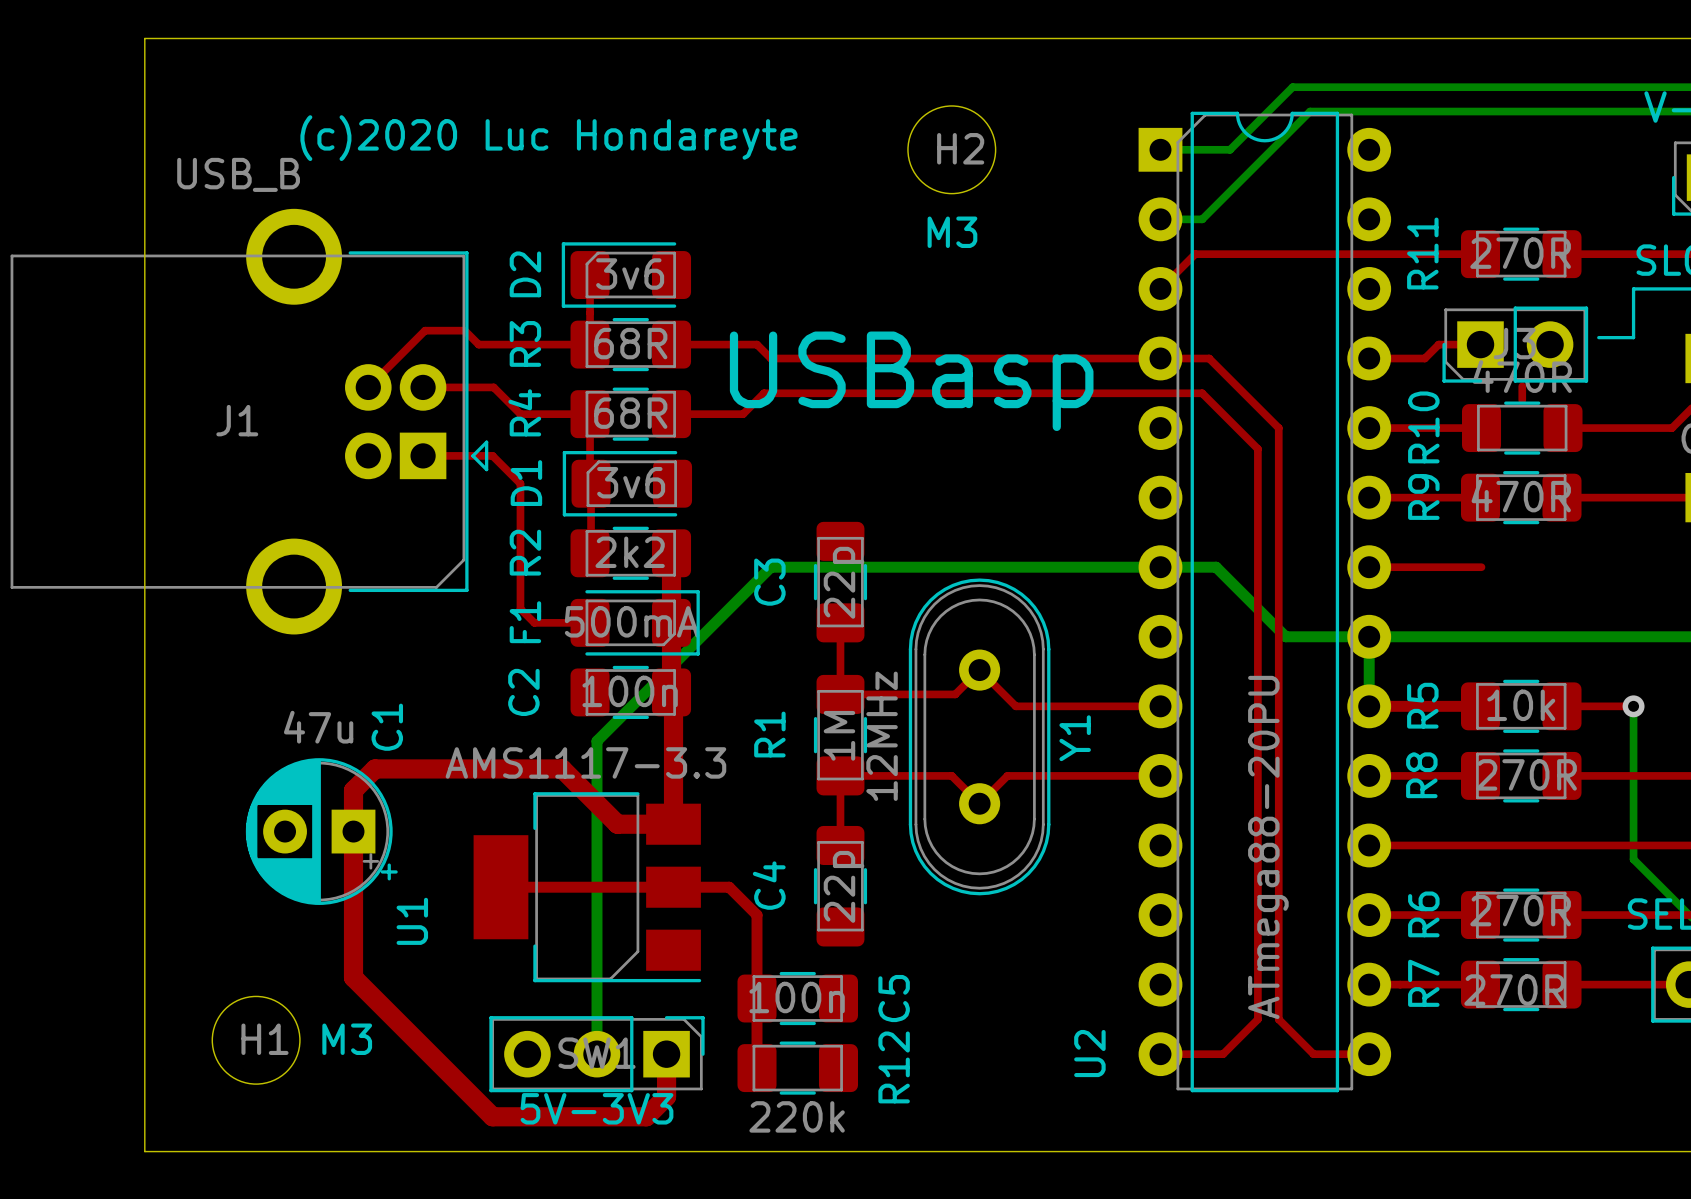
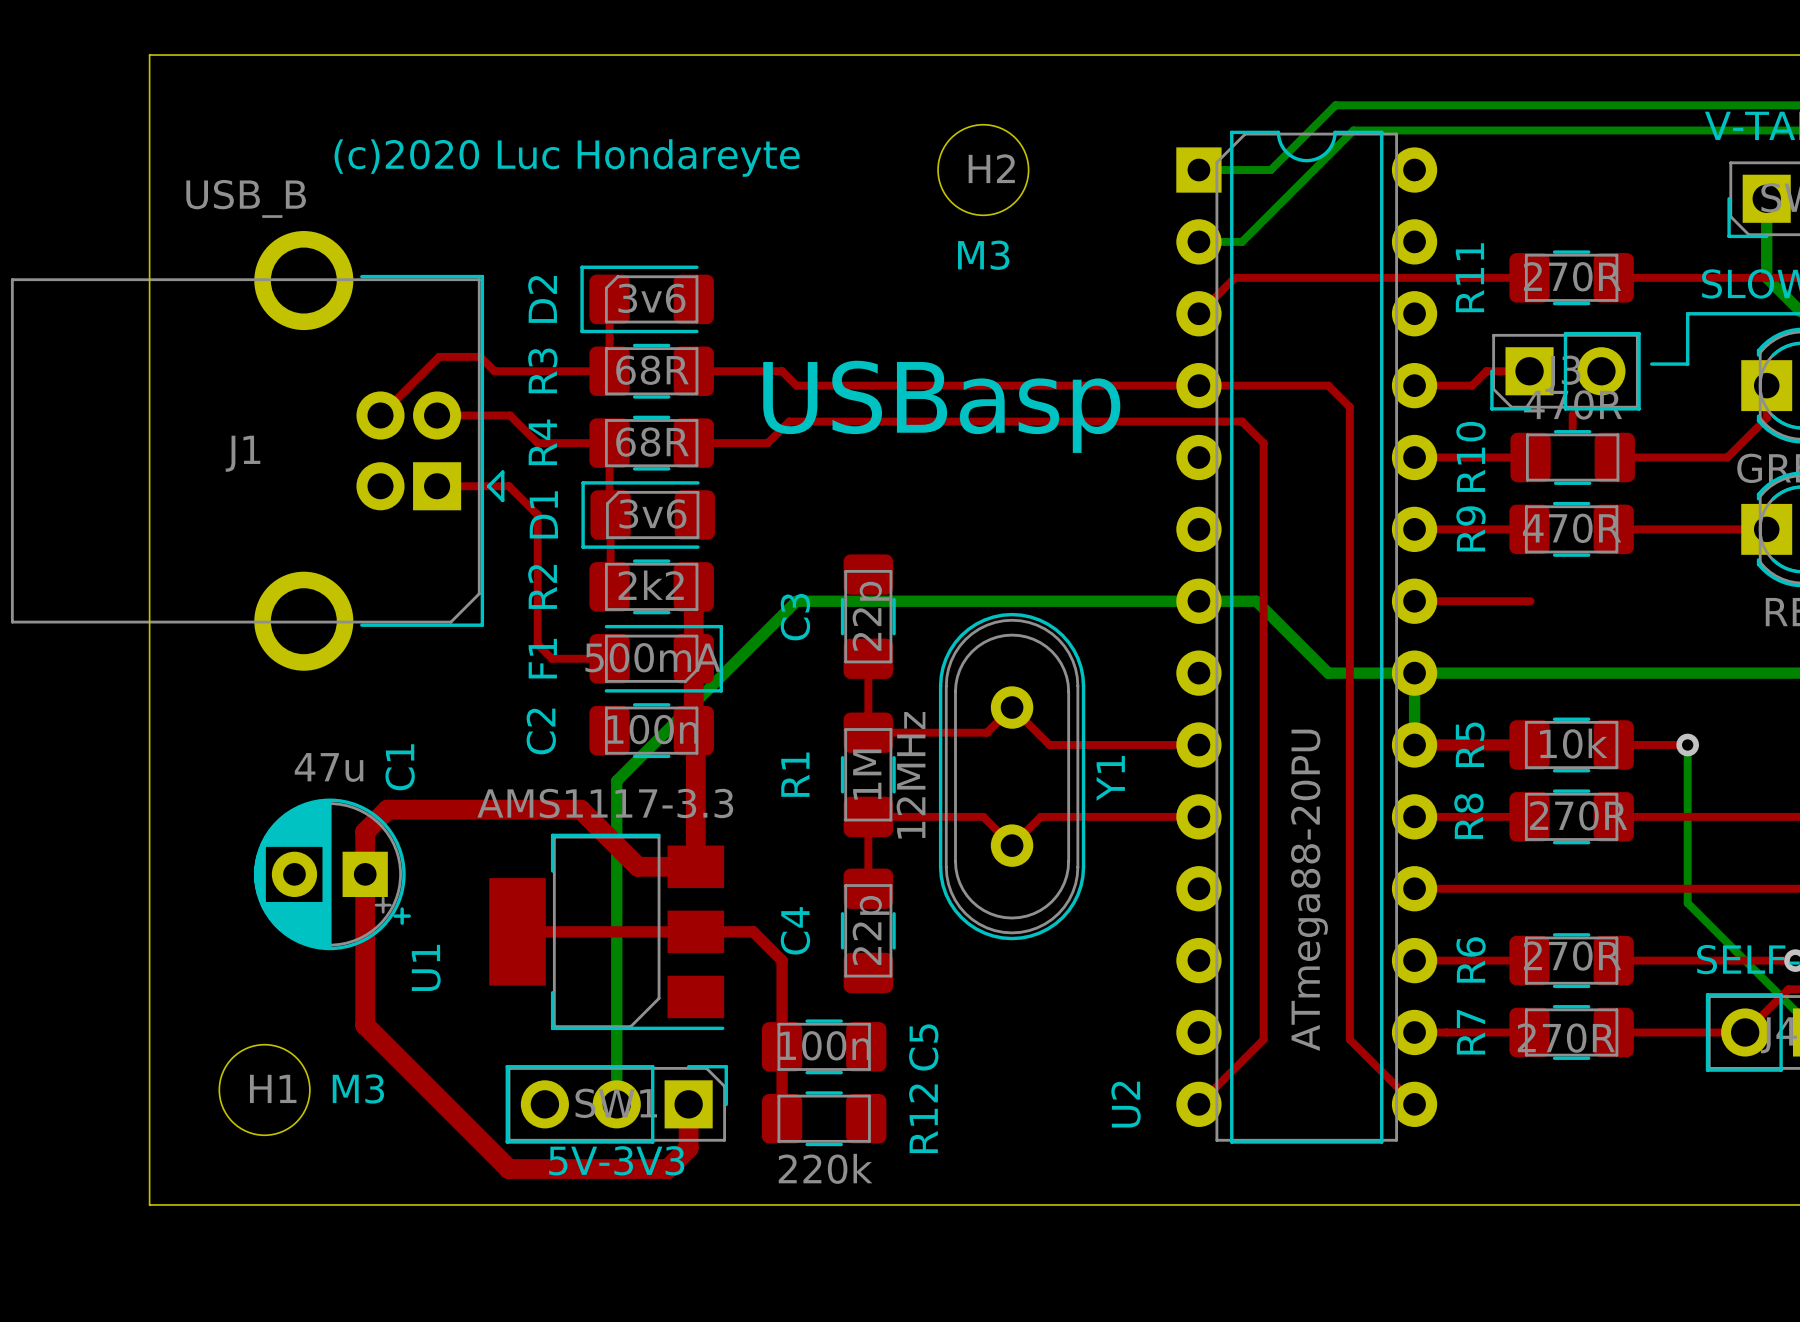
top track: (1209, 358) (1278, 428) (1278, 1019) (1313, 1054) (1369, 1054) -> (1249, 385) (1328, 385) (1349, 407) (1349, 1039) (1414, 1104)
top track: (1223, 414) (1257, 448) (1257, 1019) (1223, 1054) (1160, 1054) -> (1263, 443) (1263, 1039) (1198, 1104)

